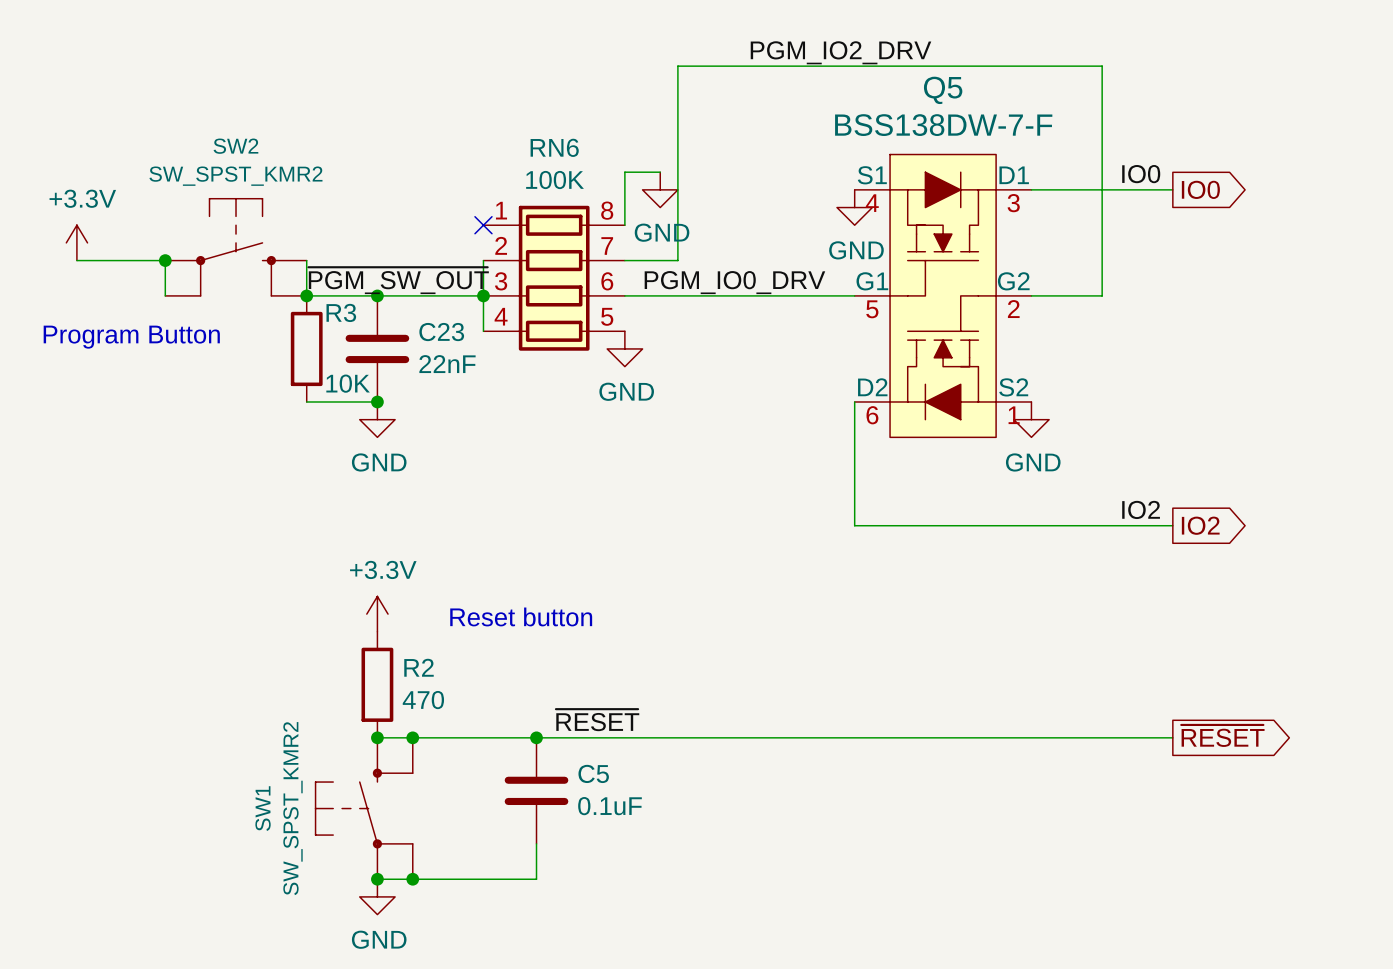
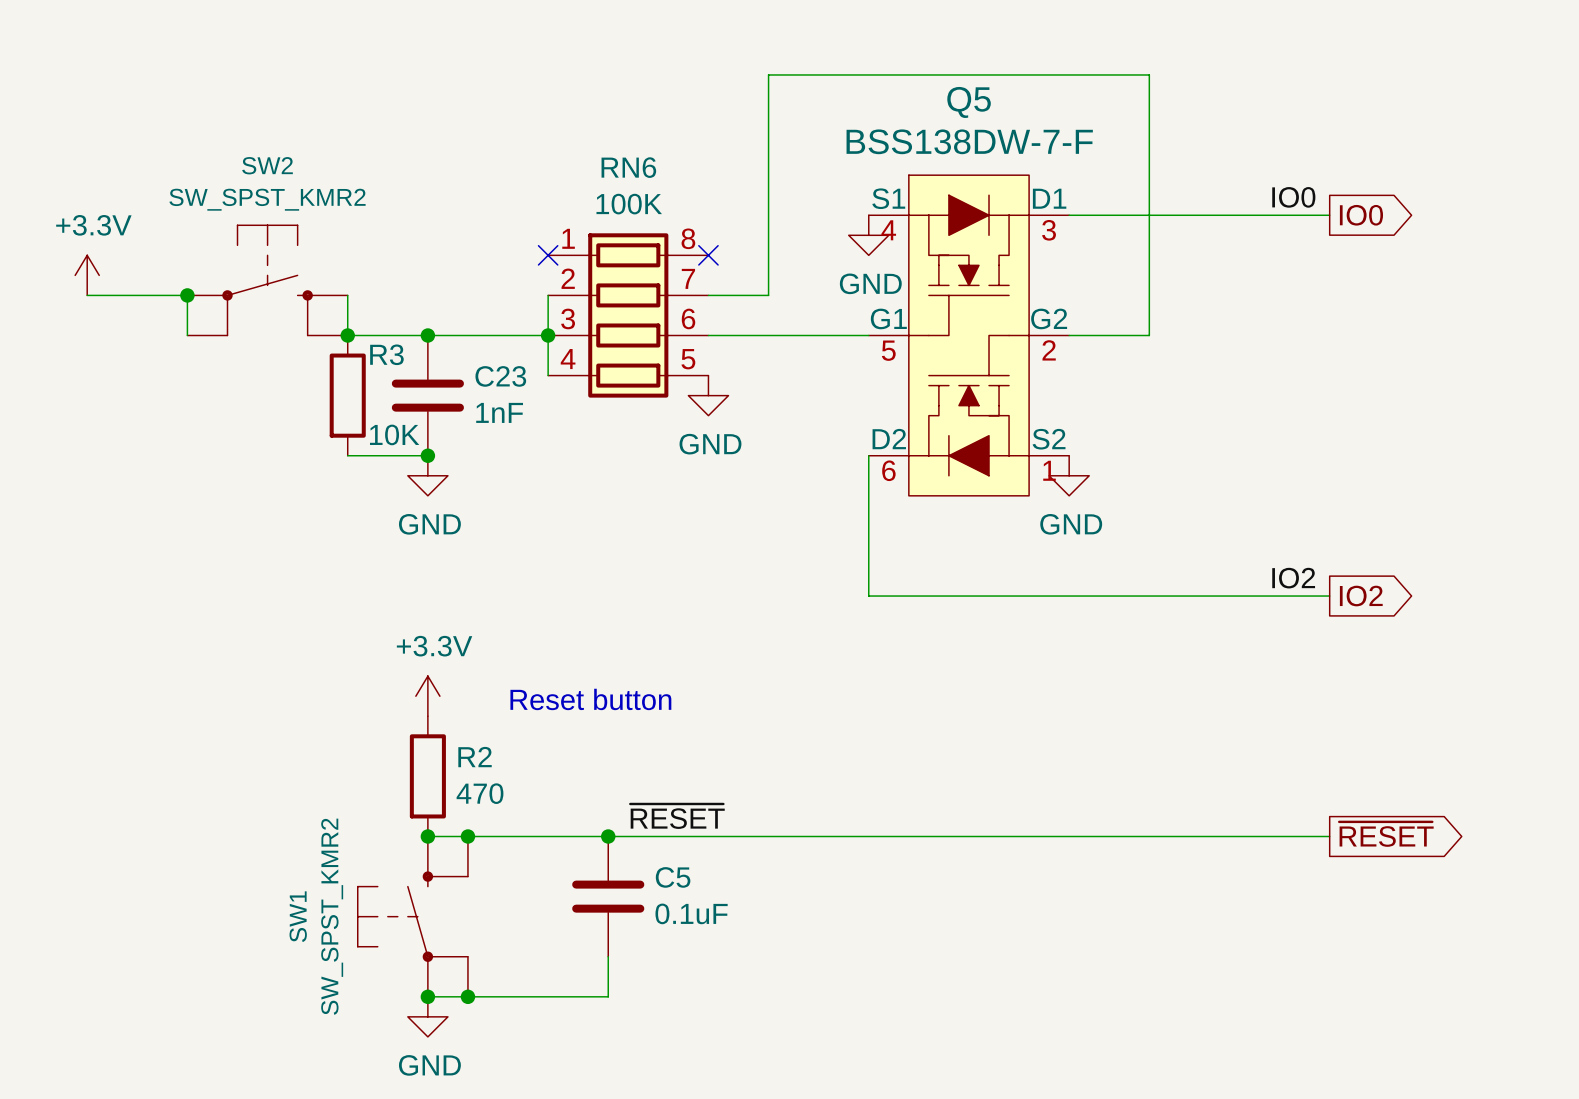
label: PGM_IO2_DRV (841, 52) -> none
wire: (1013, 66) (1102, 66) (1102, 295) (1031, 295) -> (1149, 74) (1149, 335) (1069, 335)
wire: (660, 172) (624, 172) (624, 225) -> none
power symbol: GND (660, 189) -> none
power symbol: none -> GND (868, 235)
power symbol: GND (854, 207) -> none
no-connect mark: none -> (708, 255)
label: ~{PGM_SW_OUT} (398, 280) -> none
label: PGM_IO0_DRV (734, 282) -> none
Q5 position: (943, 295) -> (968, 335)
text: Program Button (131, 337) -> none
C23 value: 22nF (447, 364) -> 1nF (499, 412)
wire: (854, 401) (854, 525) -> (868, 455) (868, 596) (968, 596)
power symbol position: GND (1031, 419) -> GND (1069, 475)

